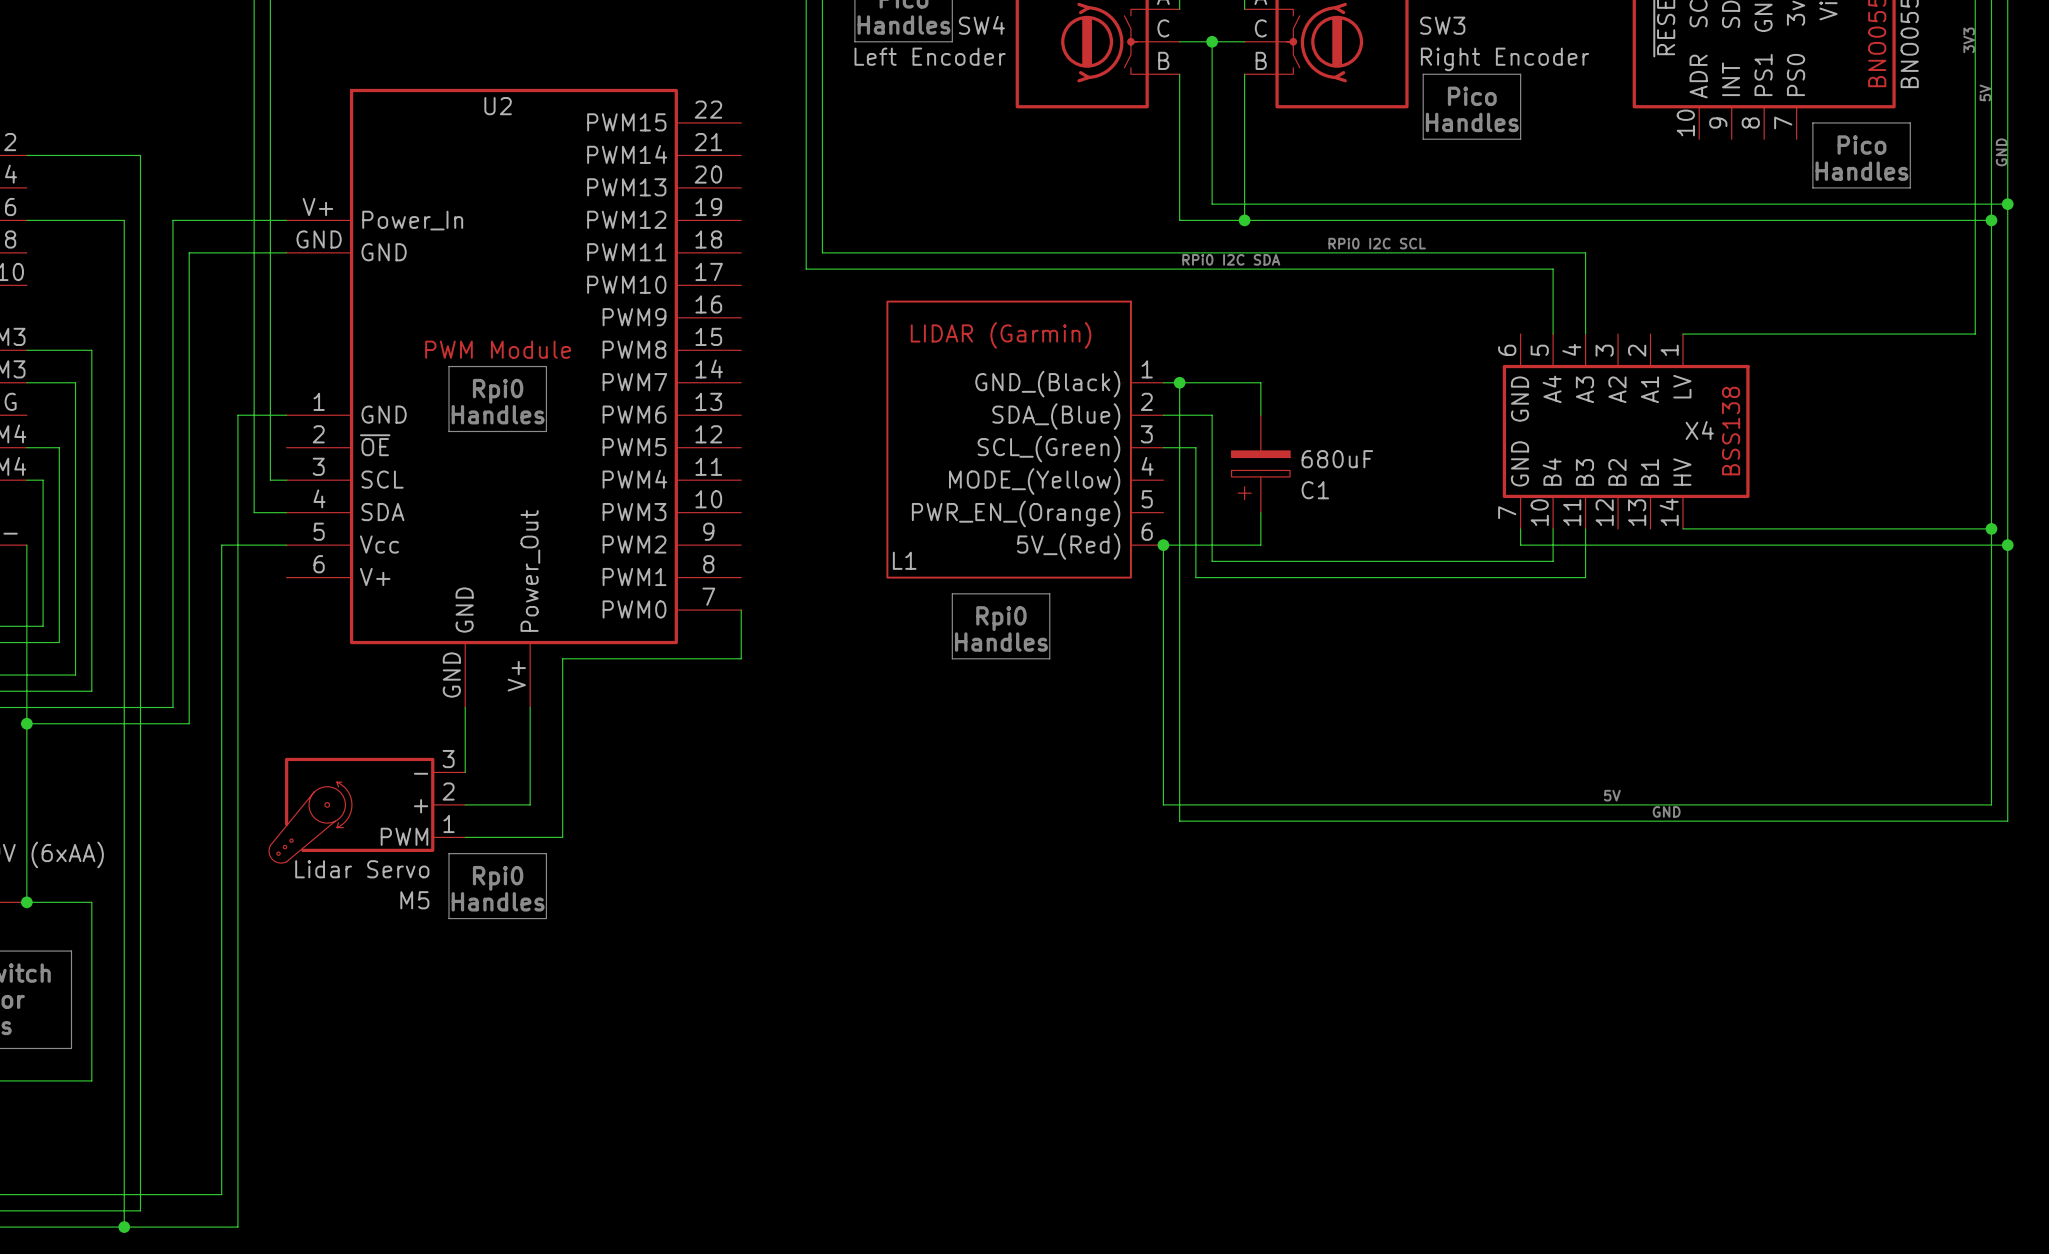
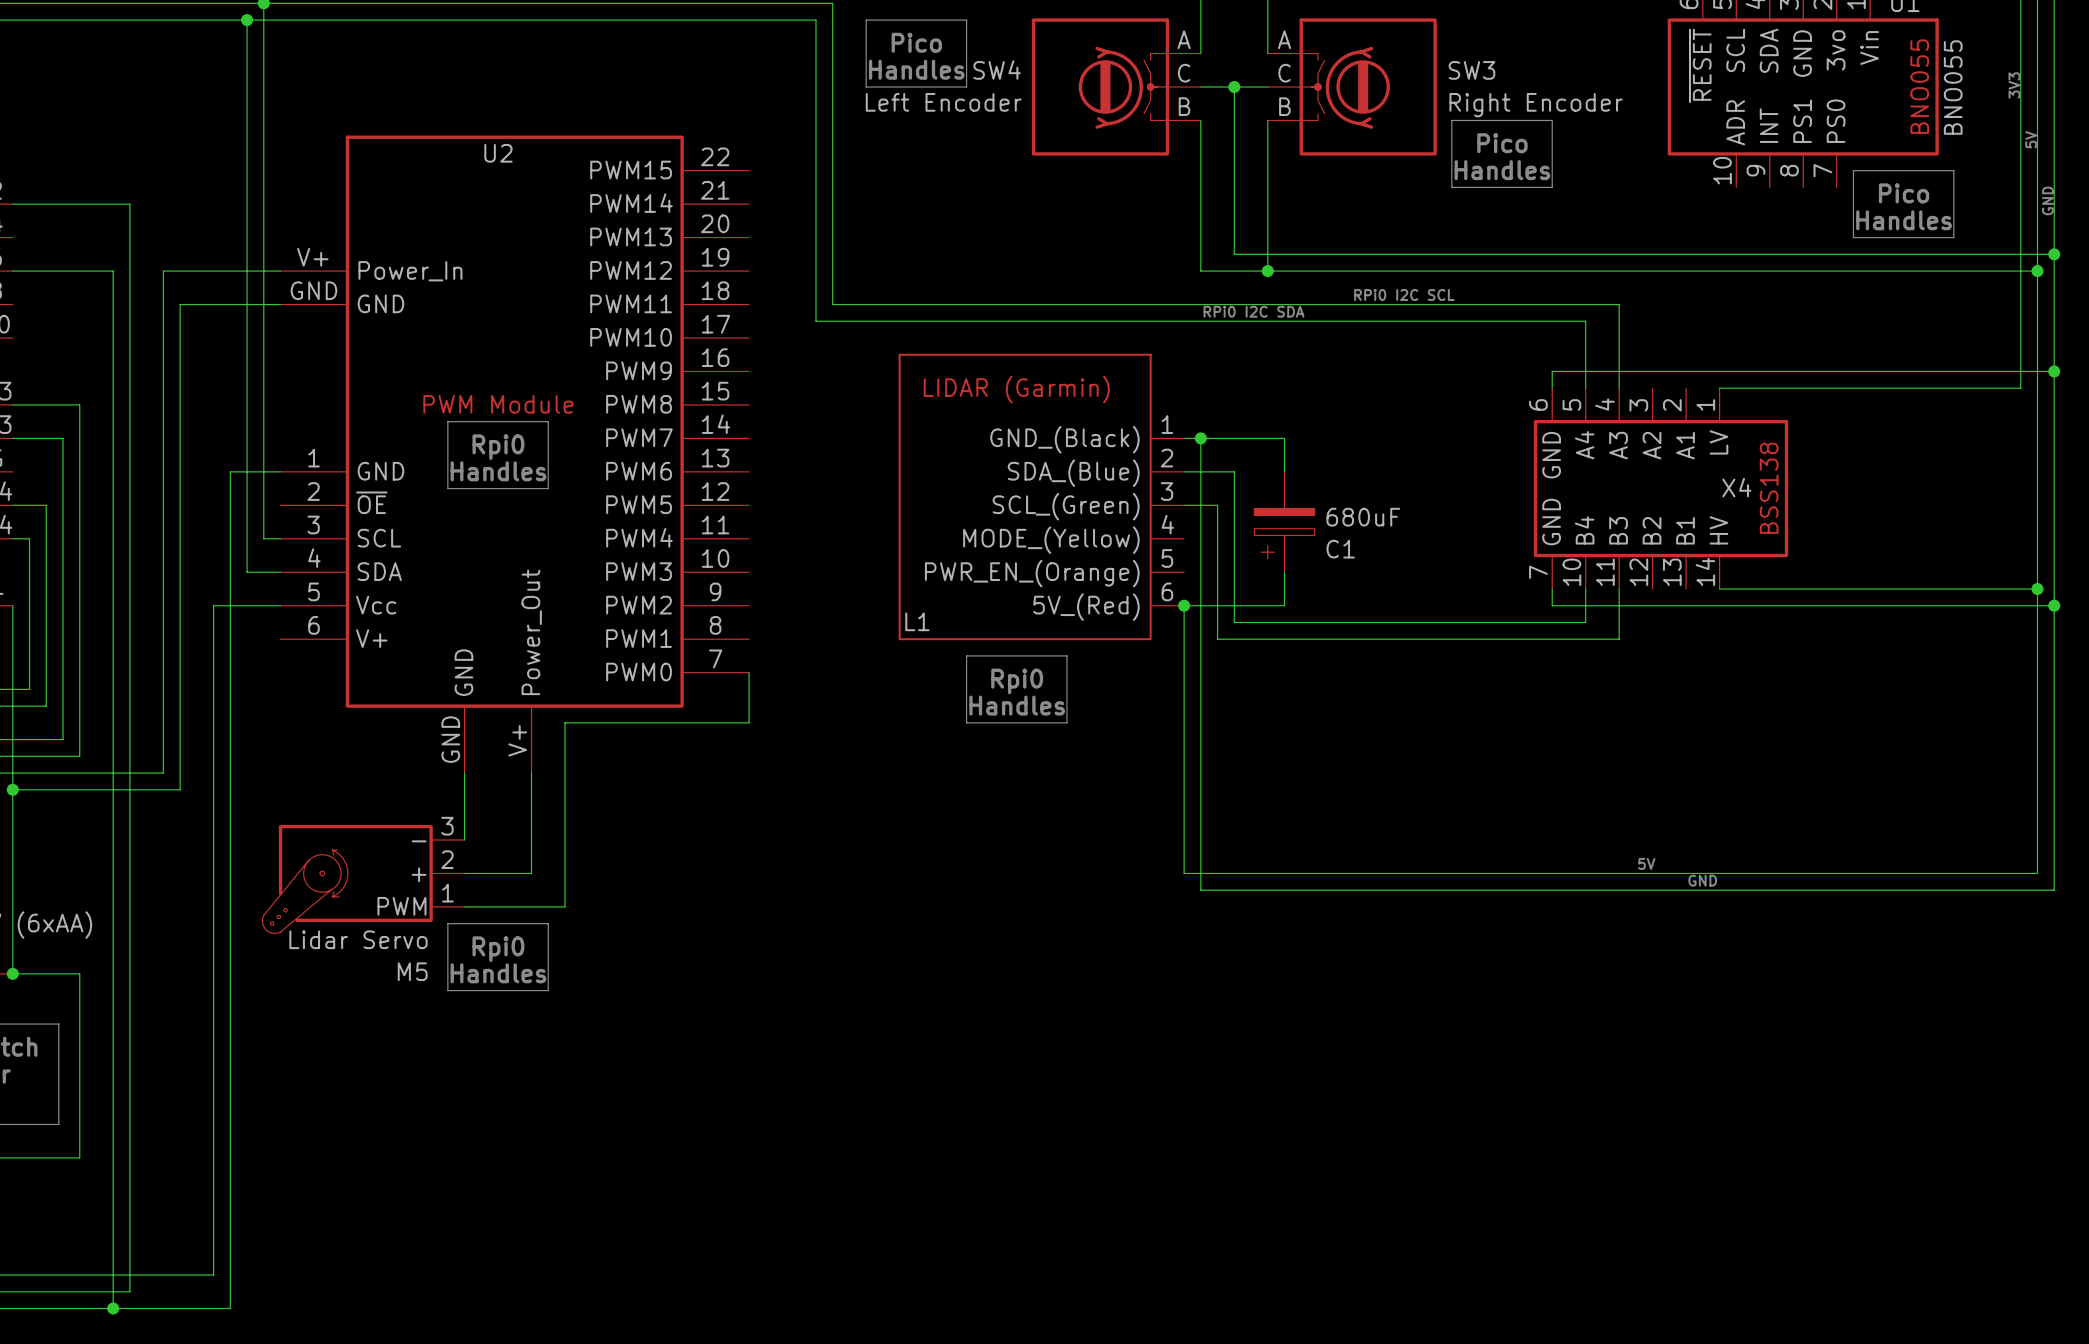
wire: none -> (2054, 371) (1552, 371) (1552, 388)
junction: none -> (2054, 371)

